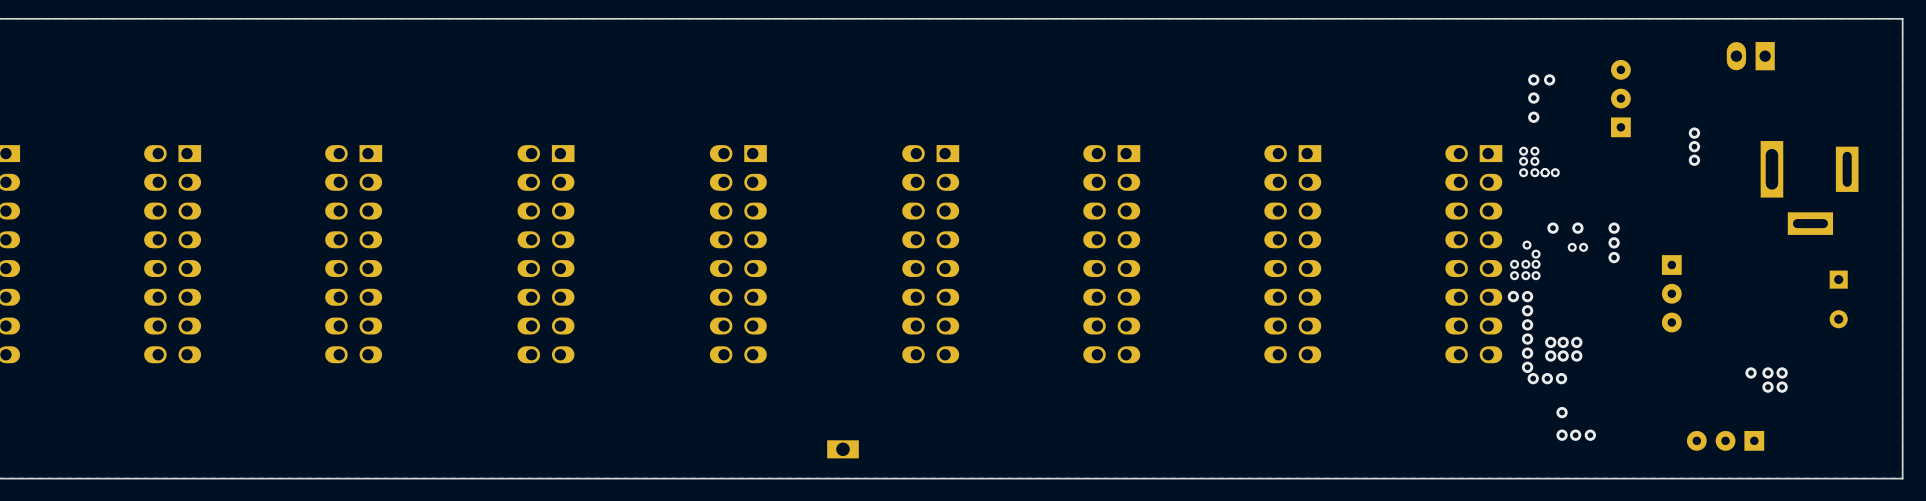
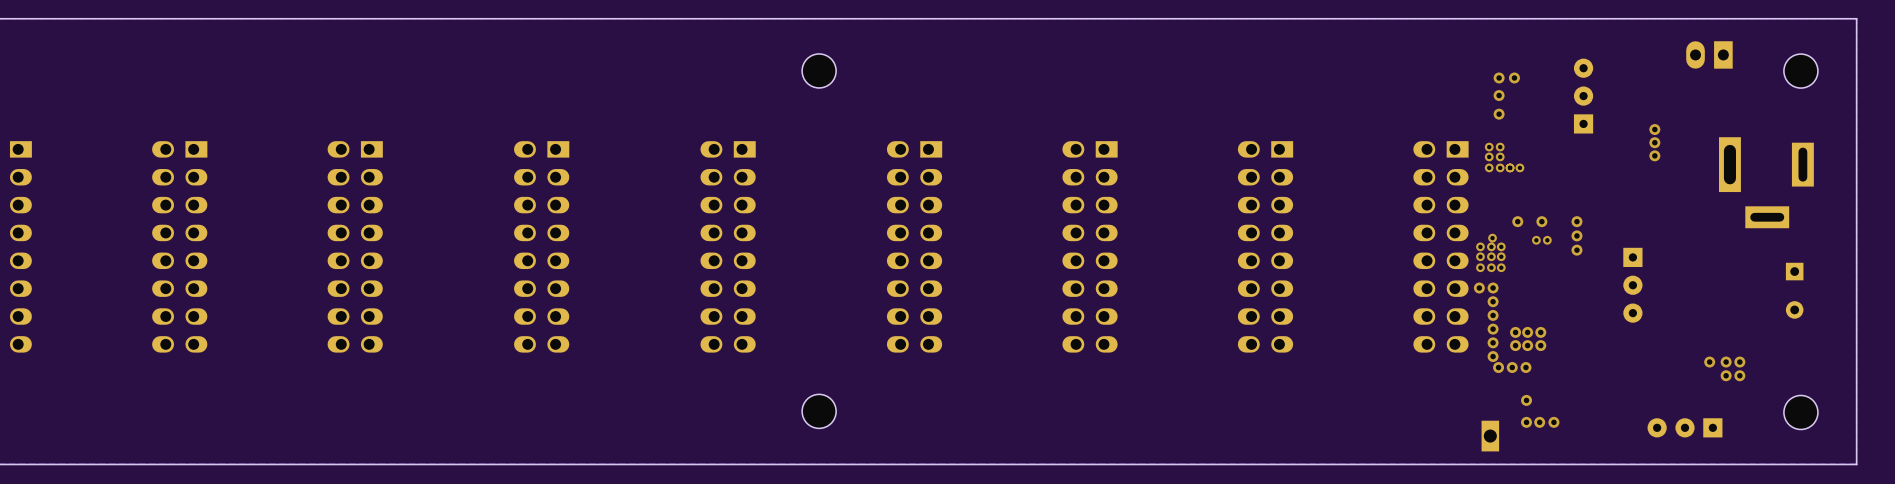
part: none -> (819, 70)
part: none -> (1800, 71)
via: none -> (1480, 246)
via: none -> (1491, 246)
part: none -> (819, 411)
part: none -> (1800, 412)
part: (843, 449) -> none
part: none -> (1490, 436)

